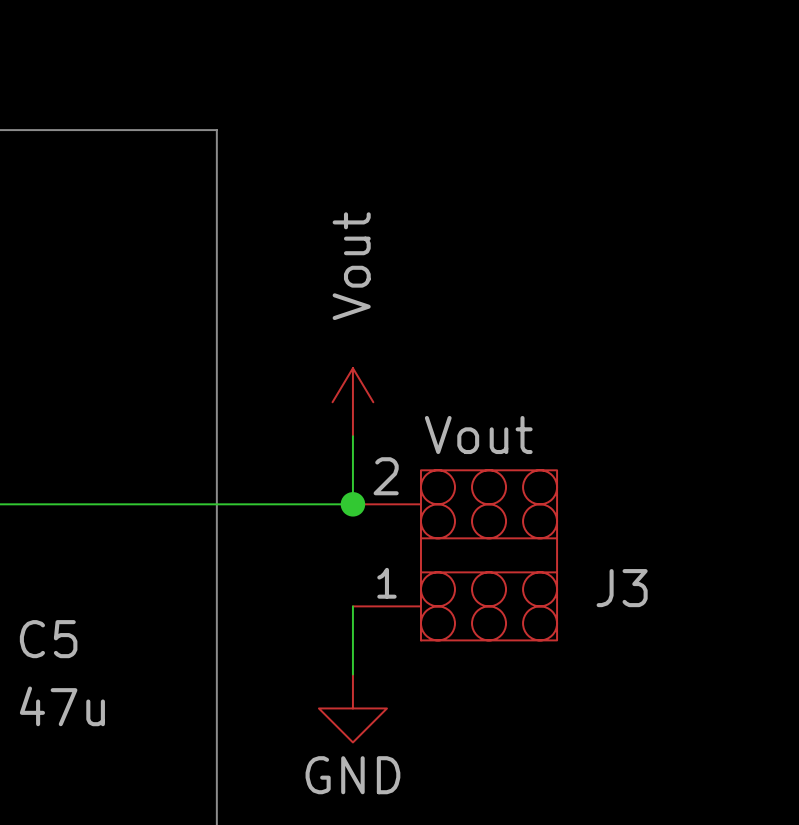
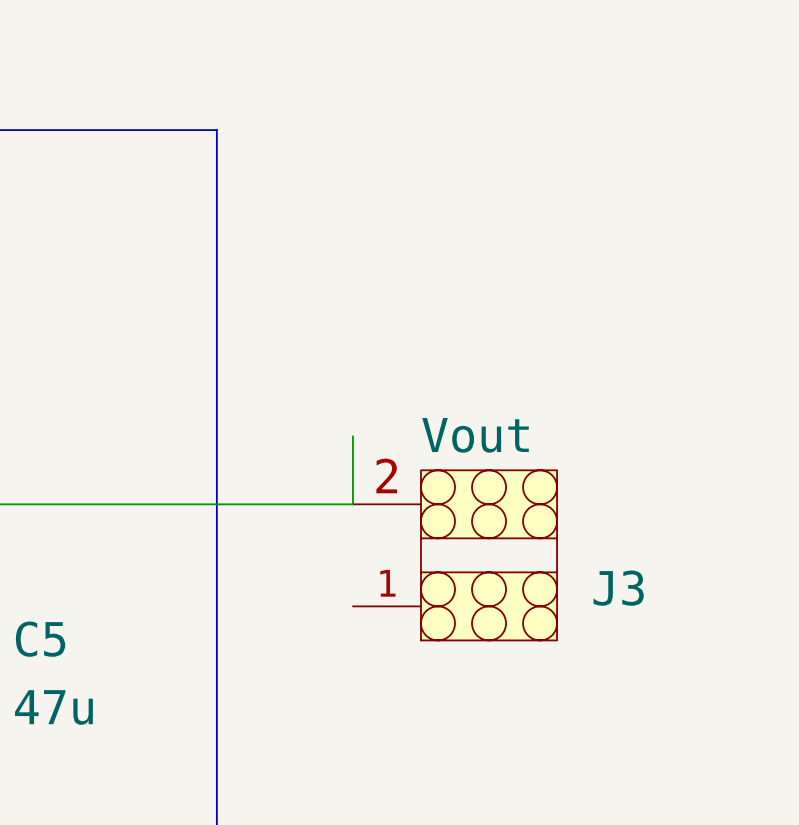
power symbol: Vout (352, 402) -> none
junction: (352, 504) -> none
wire: (352, 606) (352, 674) -> none
power symbol: GND (352, 708) -> none

